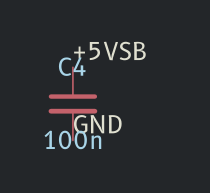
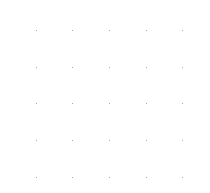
label: +5VSB (109, 51) -> none
C4: 100n (72, 103) -> none
label: GND (97, 124) -> none

